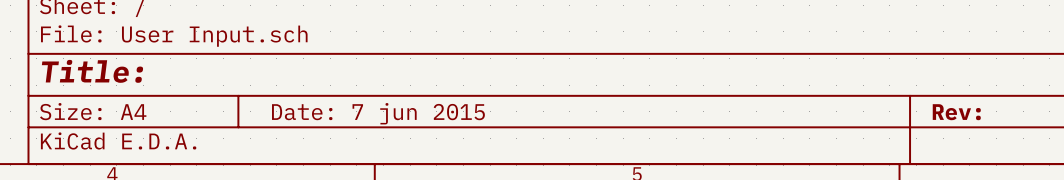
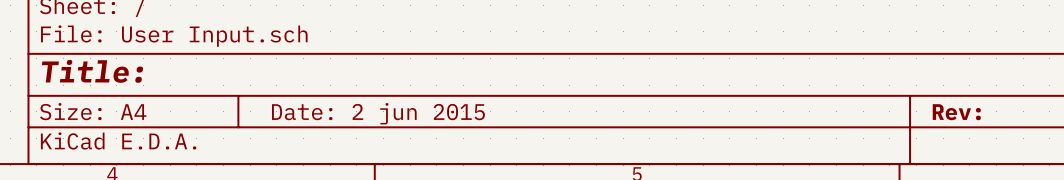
title block: Date: 7 jun 2015 (378, 113) -> Date: 2 jun 2015 (378, 113)

